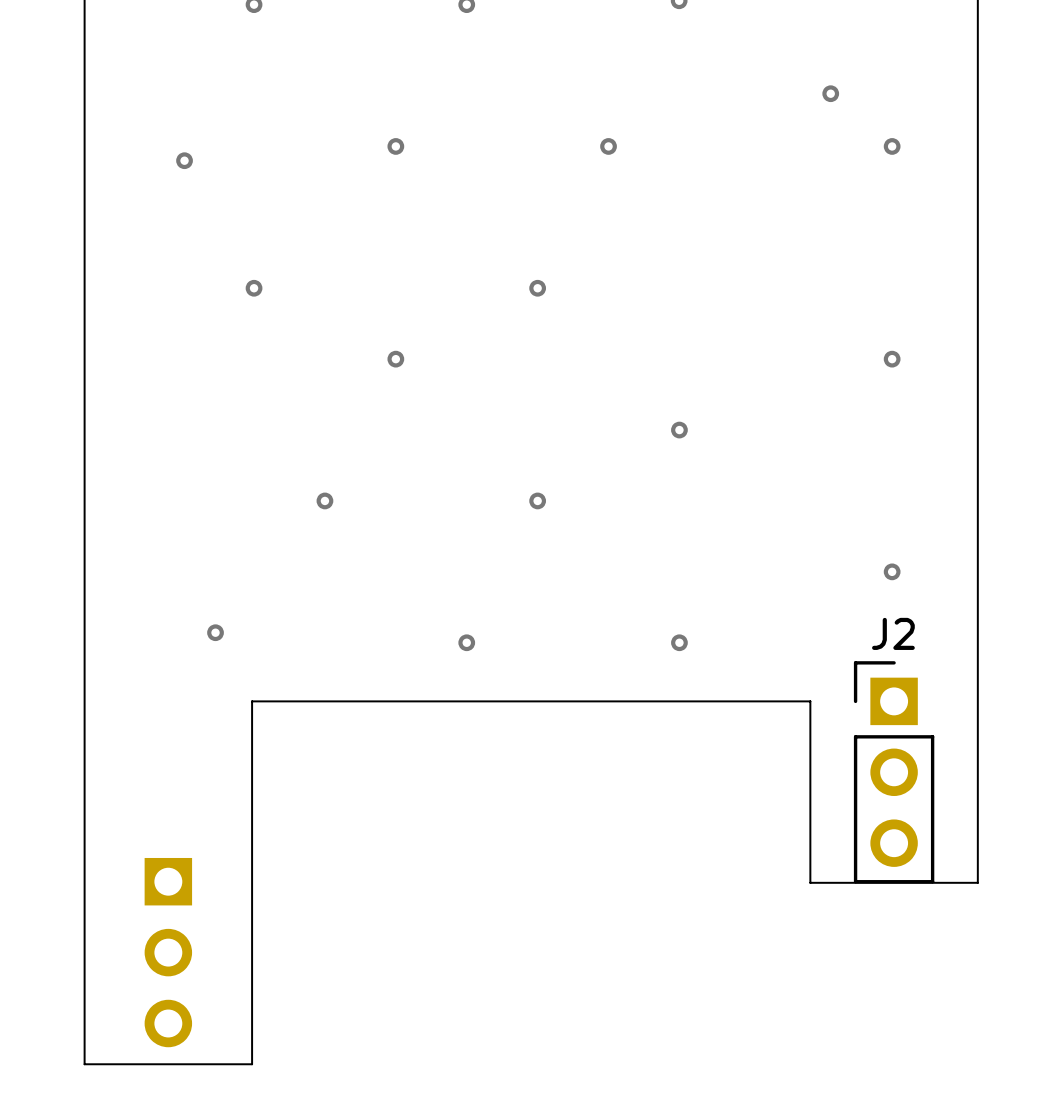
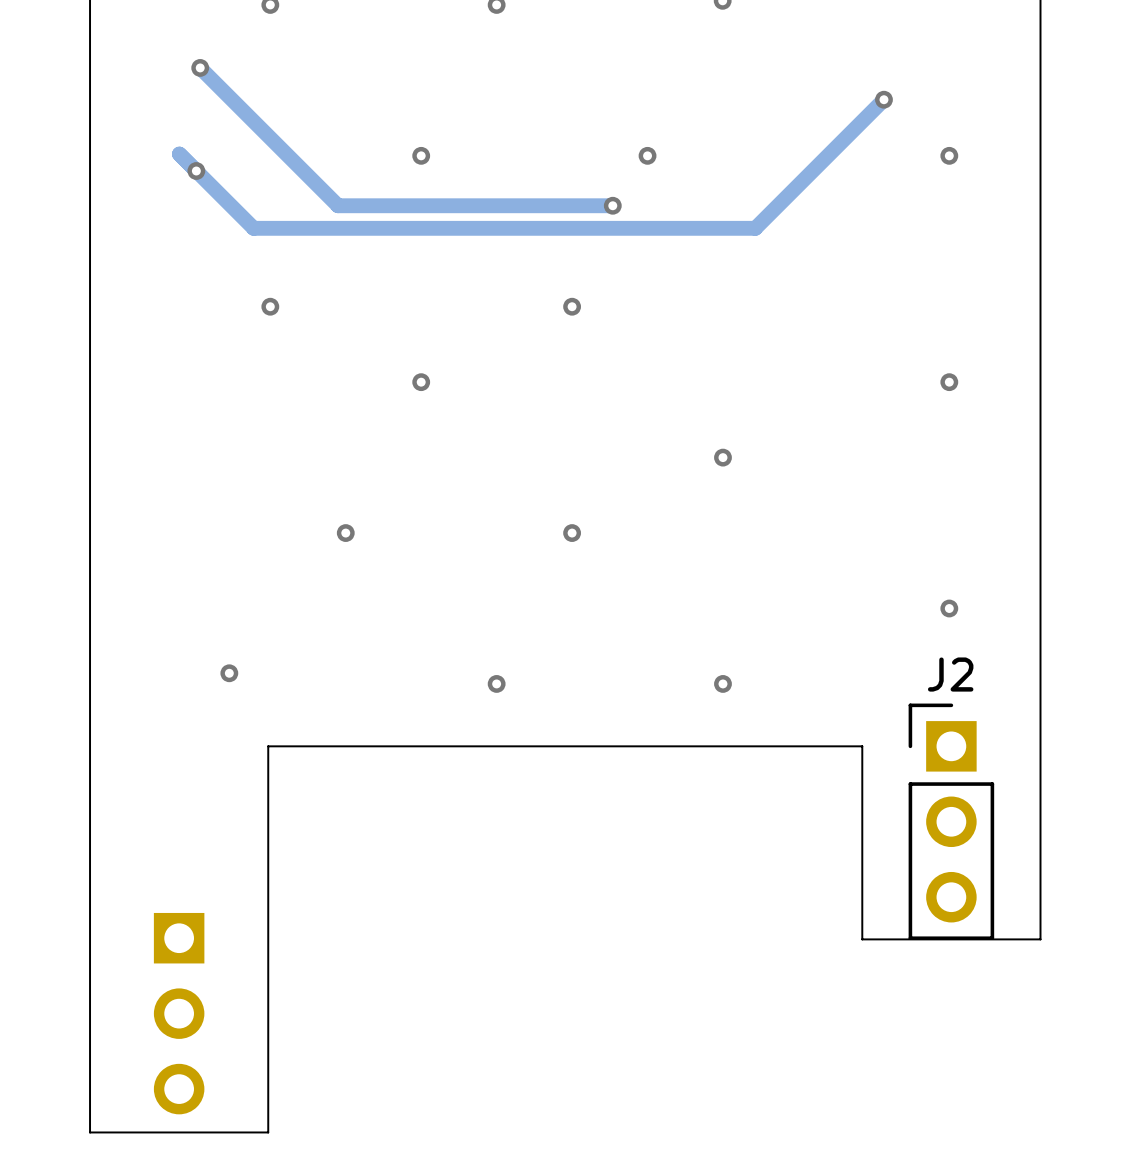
track: none -> (200, 67) (338, 205) (612, 205)
via: none -> (200, 67)
track: none -> (883, 99) (755, 228) (253, 228) (179, 154)
via: none -> (612, 205)

